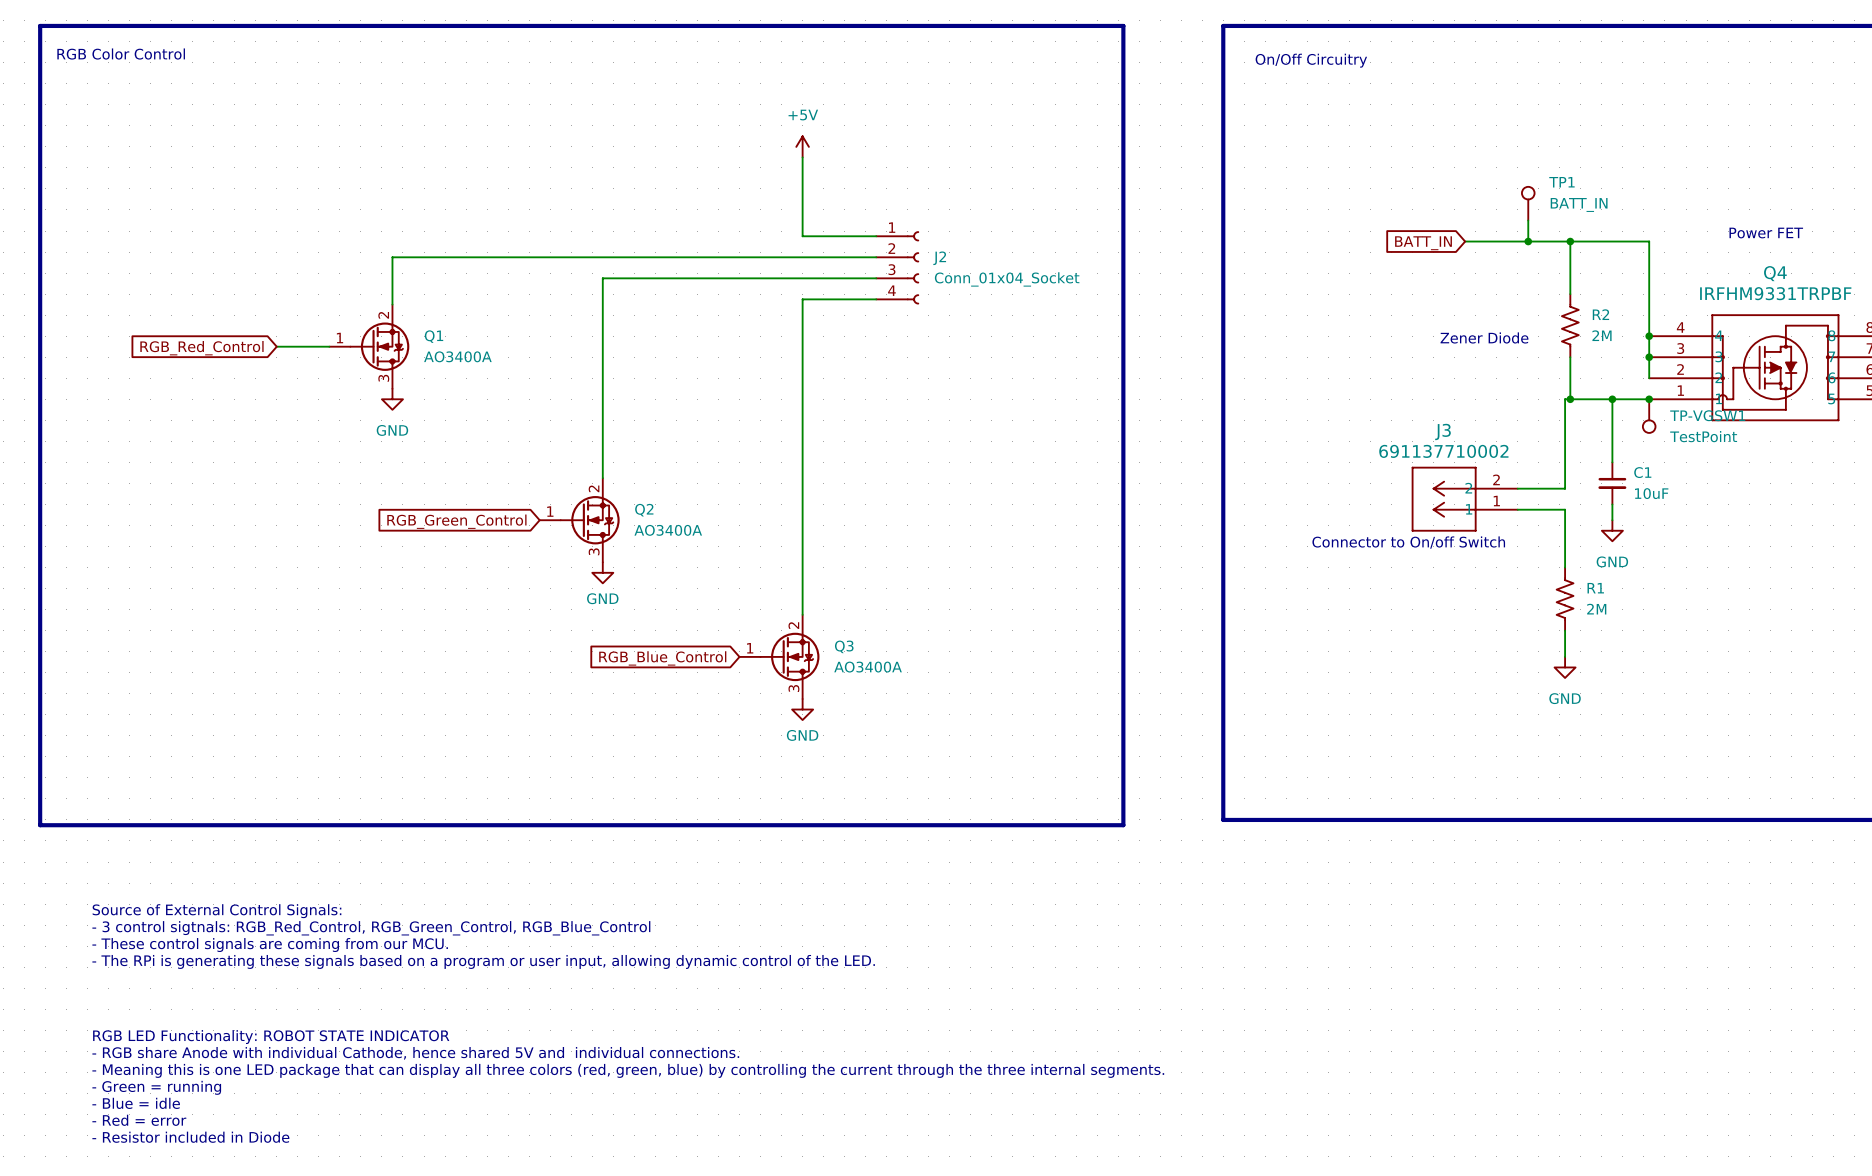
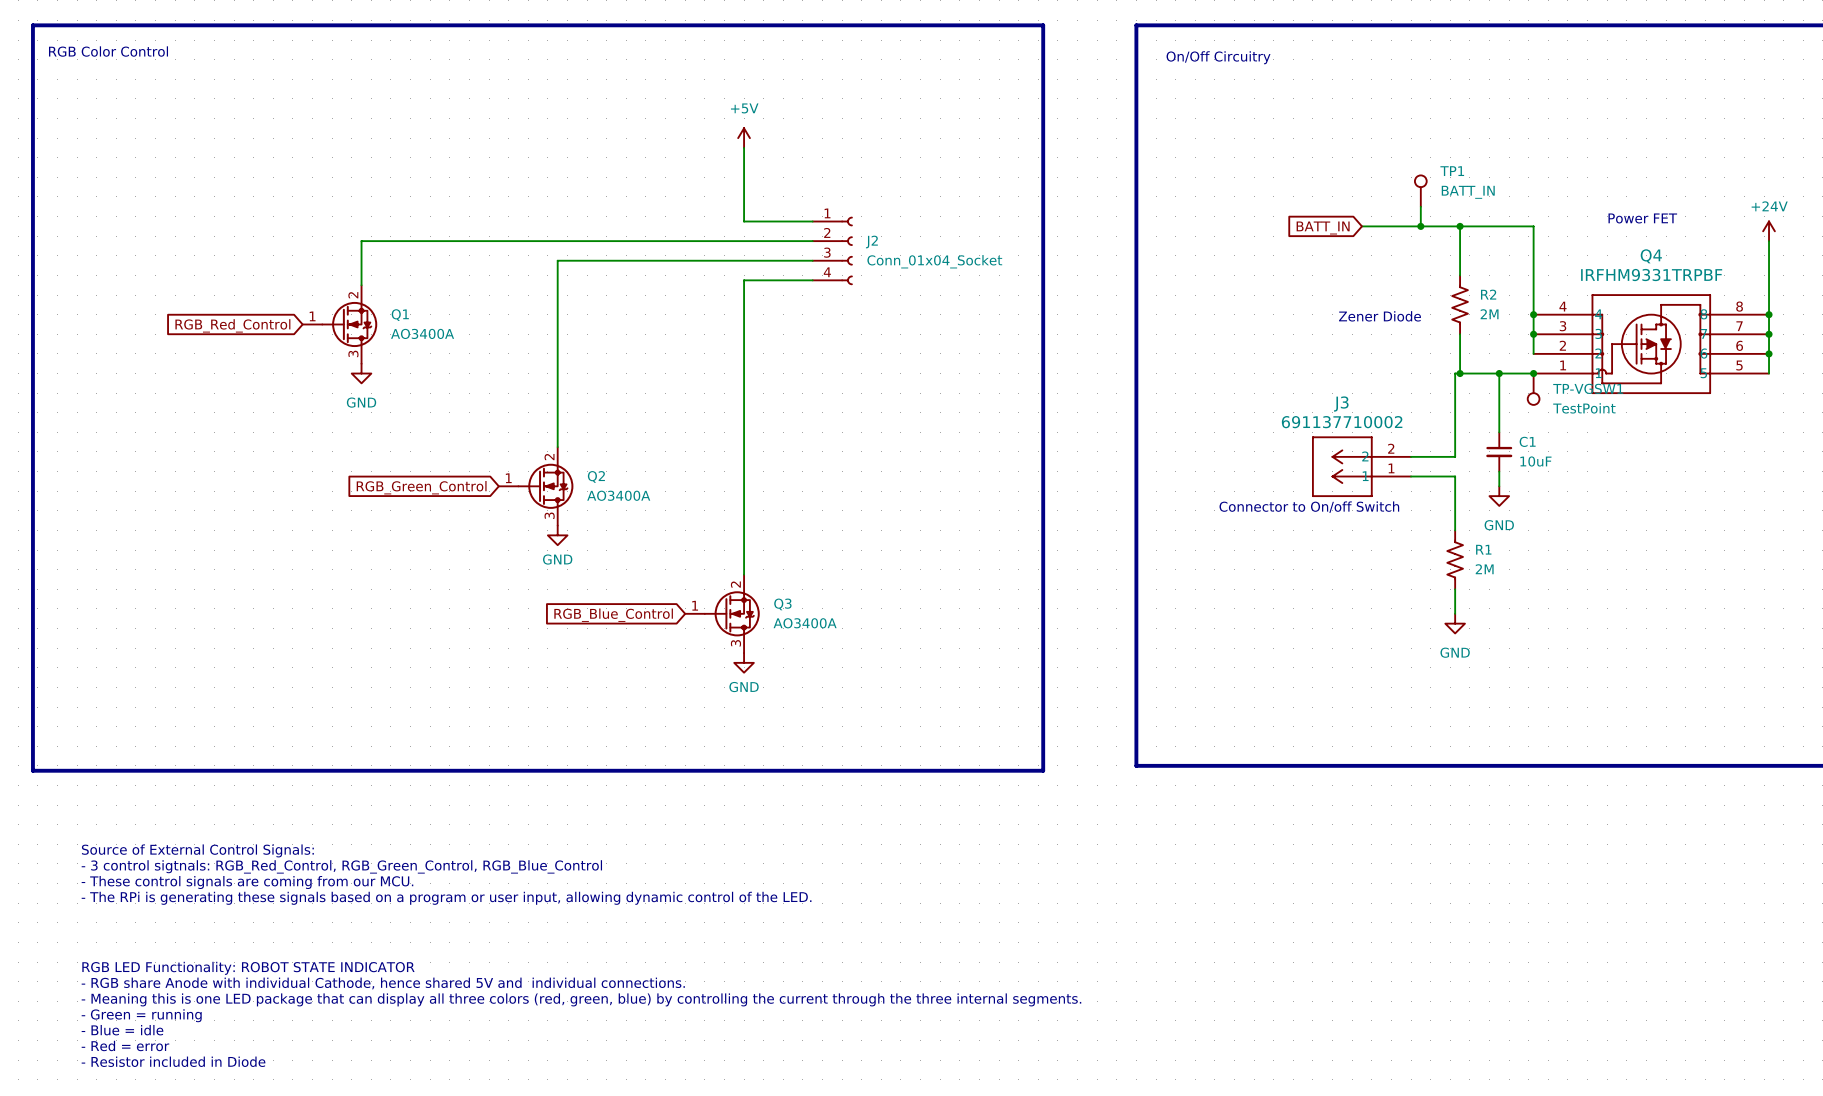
wire: (276, 346) (329, 346) -> none
global label position: RGB_Red_Control (201, 348) -> RGB_Red_Control (232, 325)

